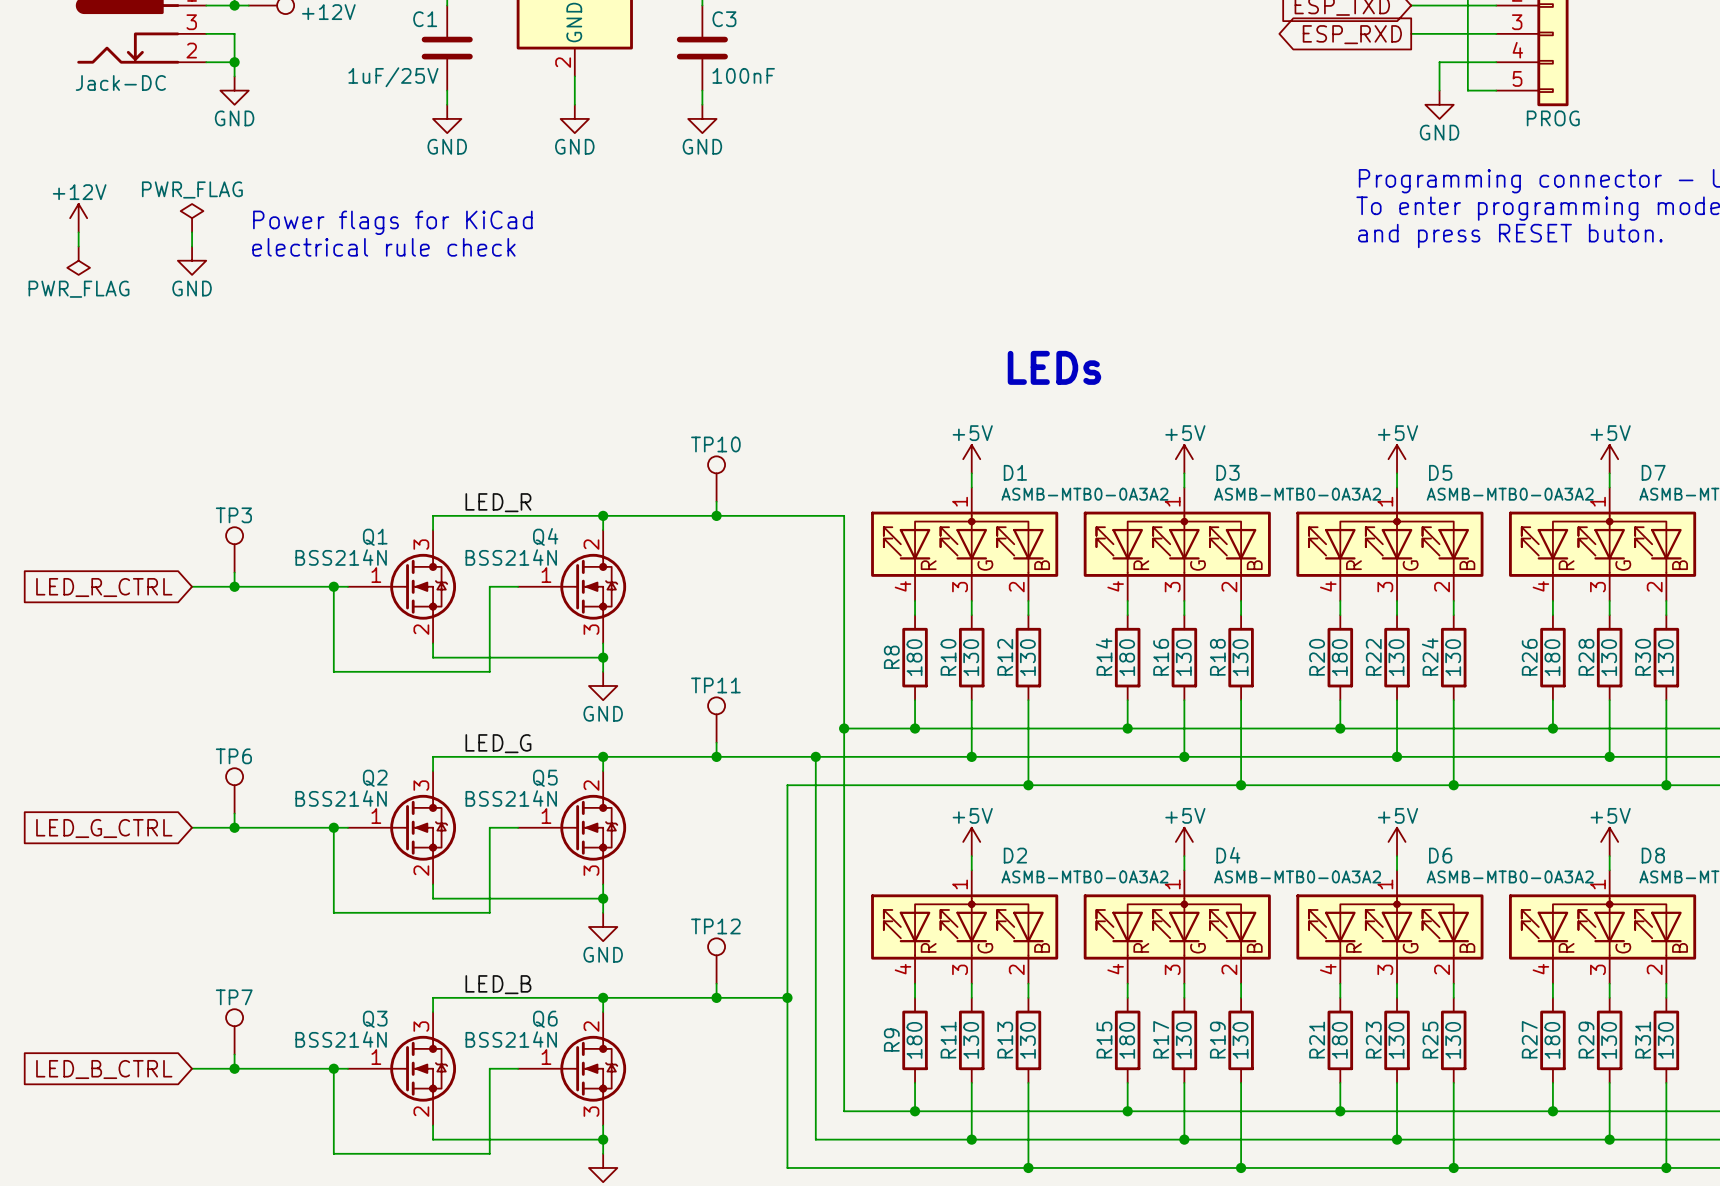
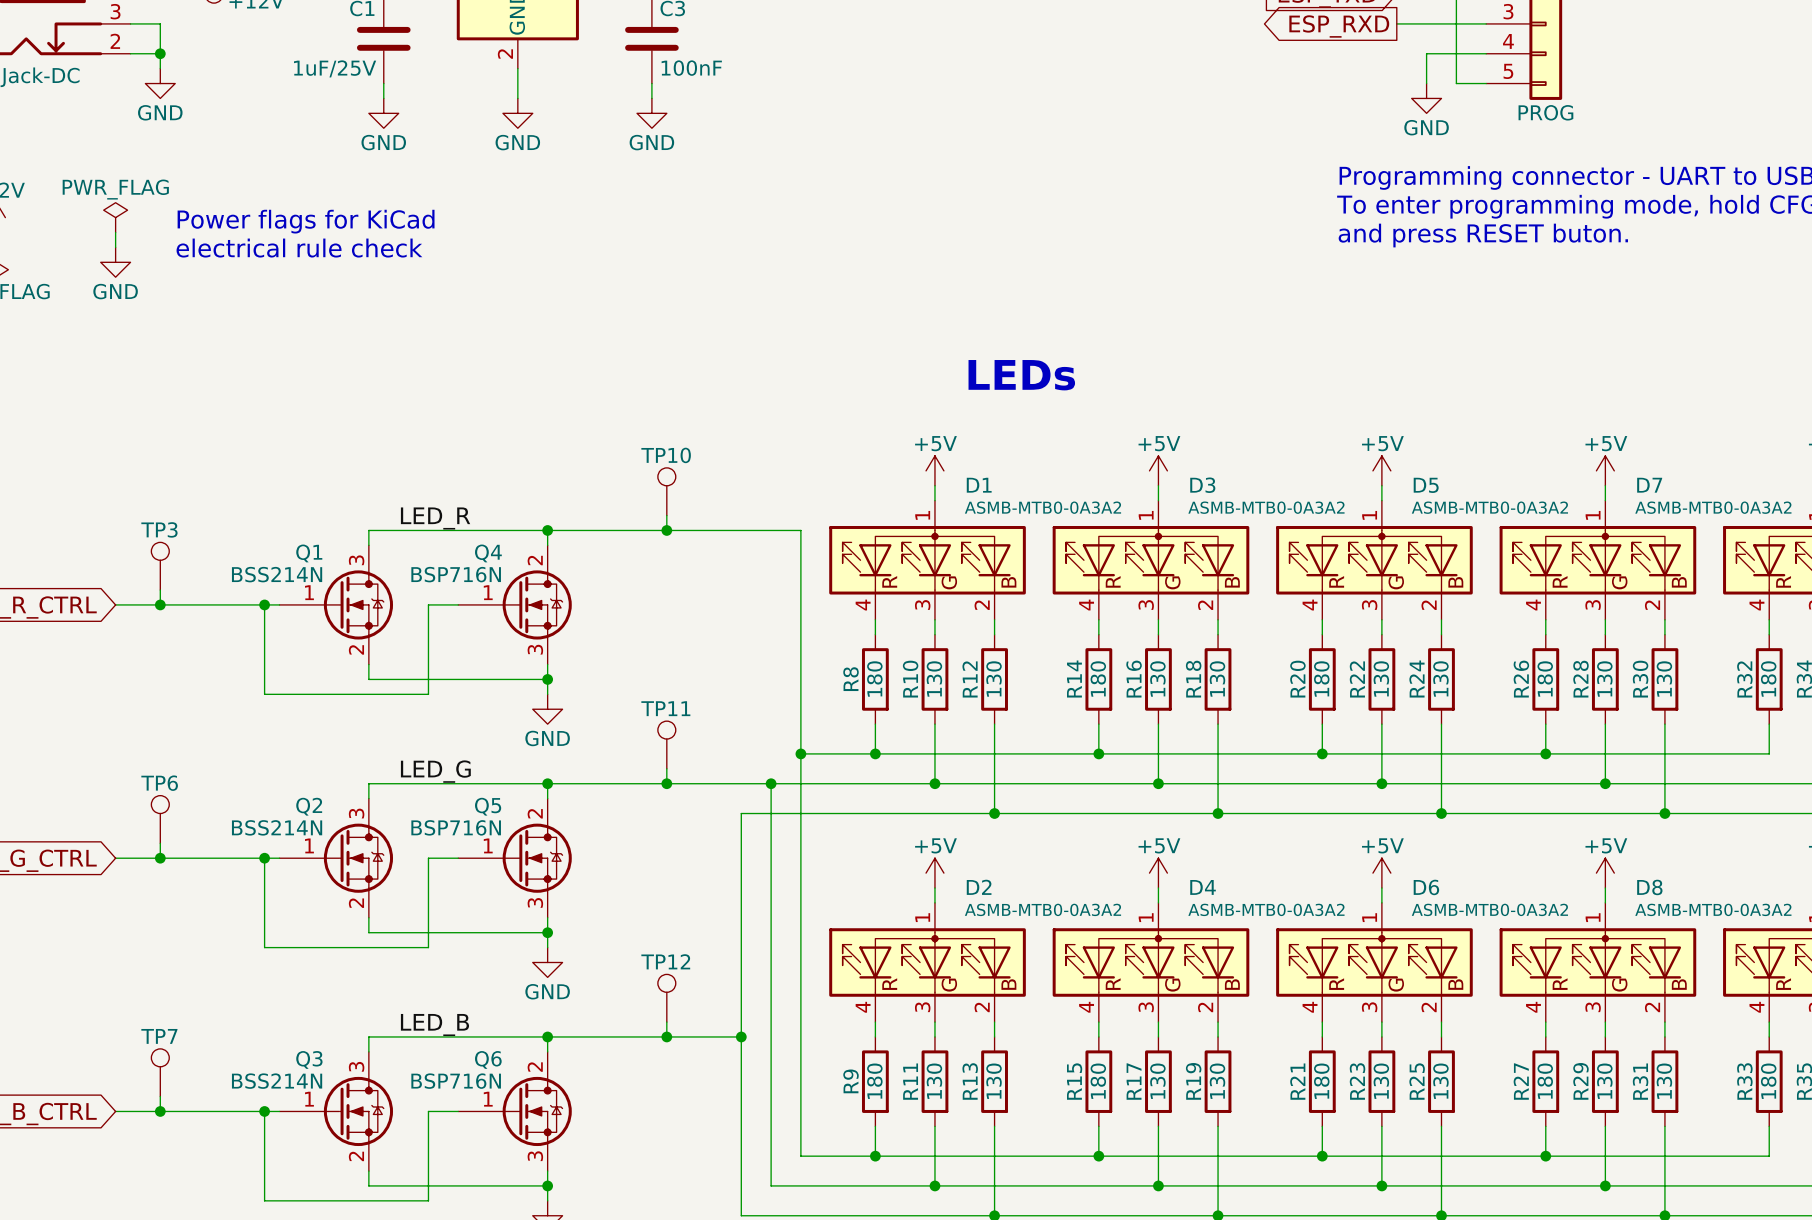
Q4 value: BSS214N (511, 557) -> BSP716N (456, 574)
Q5 value: BSS214N (511, 798) -> BSP716N (456, 827)
Q6 value: BSS214N (511, 1039) -> BSP716N (456, 1081)

